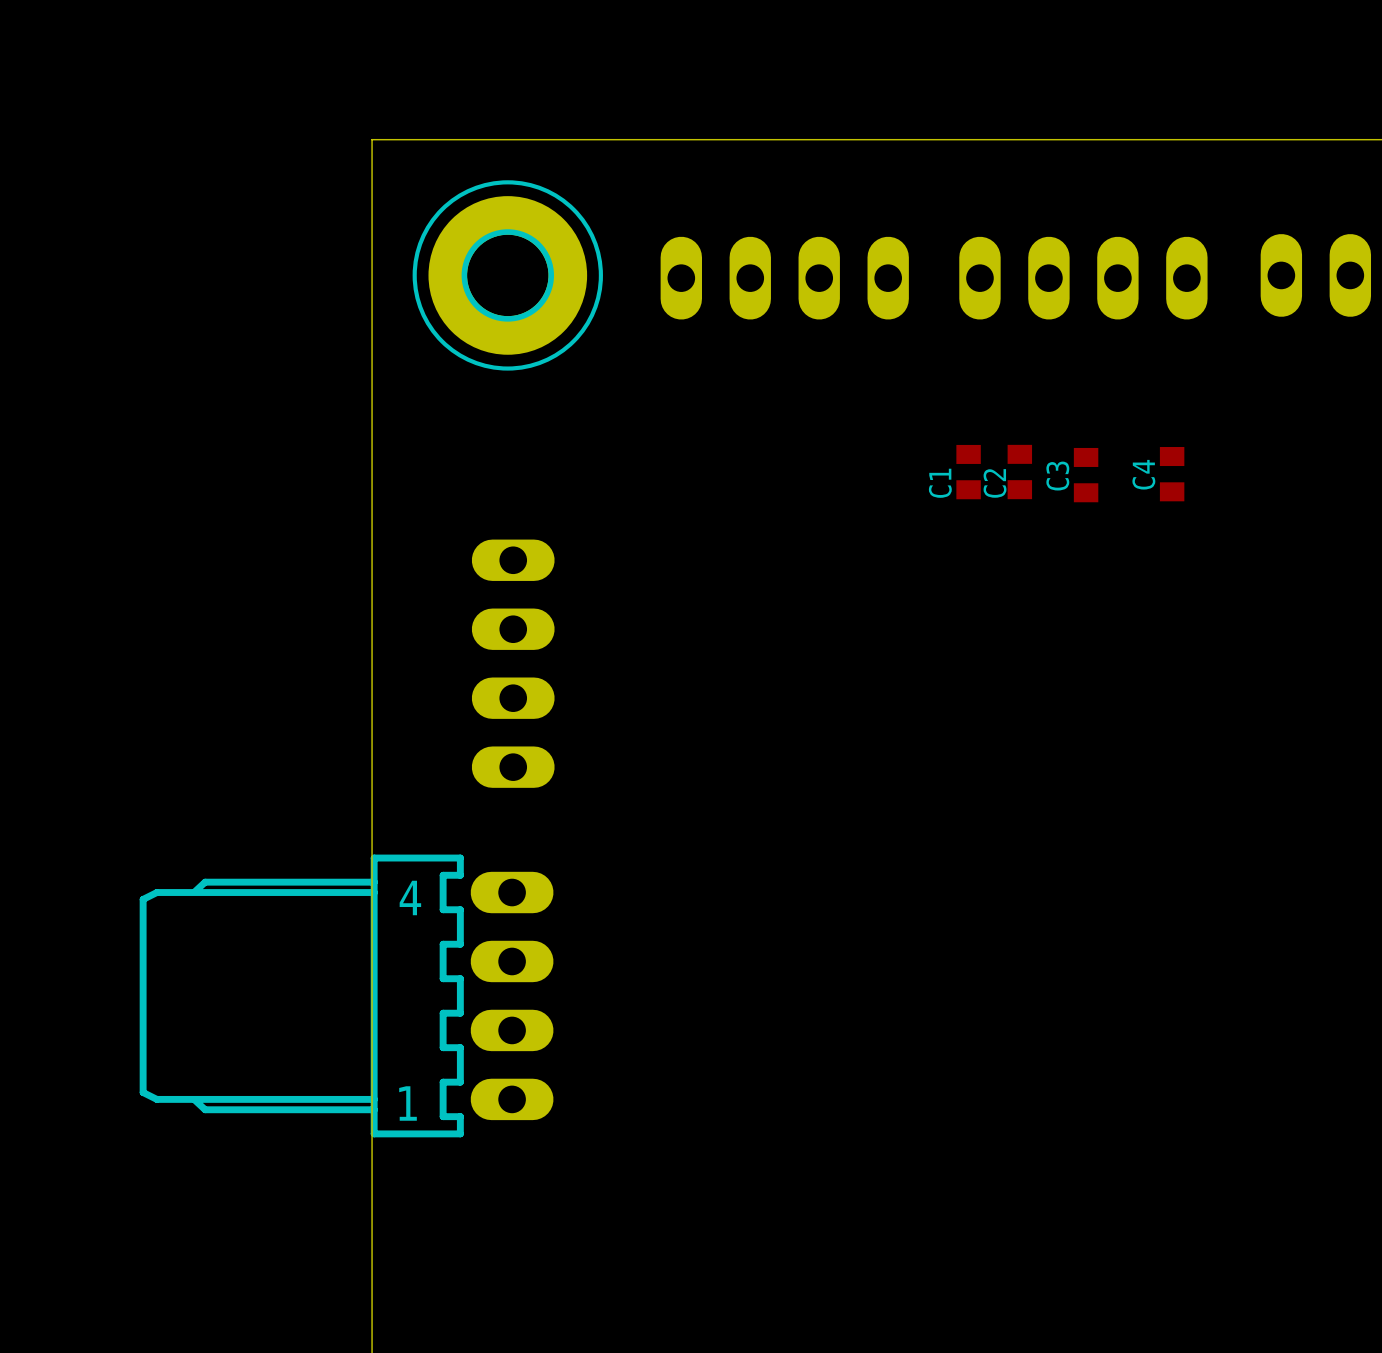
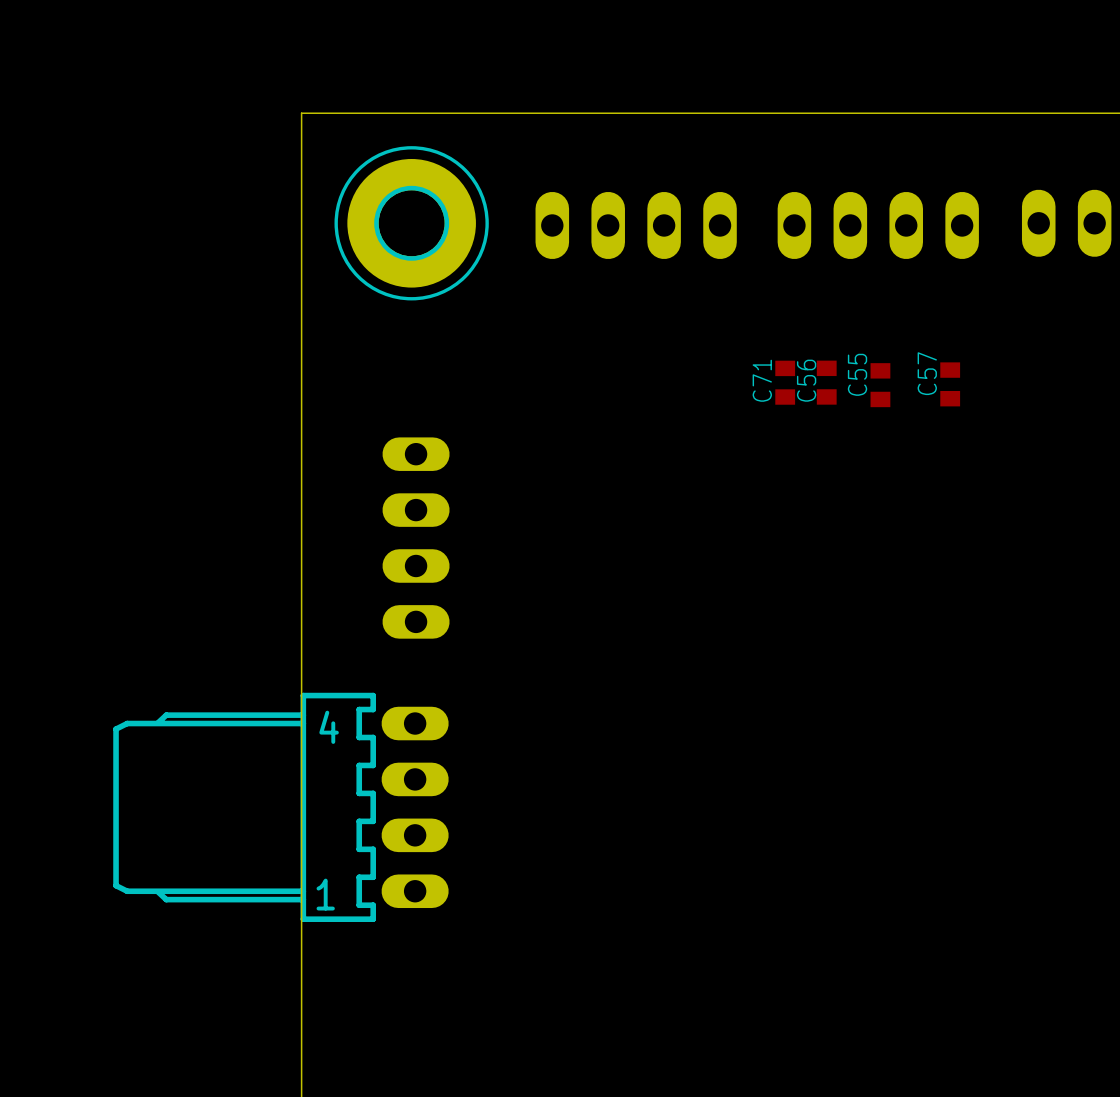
C4 name: C4 (1143, 474) -> C57 (927, 373)
C3 name: C3 (1057, 476) -> C55 (857, 374)
C1 name: C1 (940, 483) -> C71 (762, 380)
C2 name: C2 (995, 483) -> C56 (806, 380)

